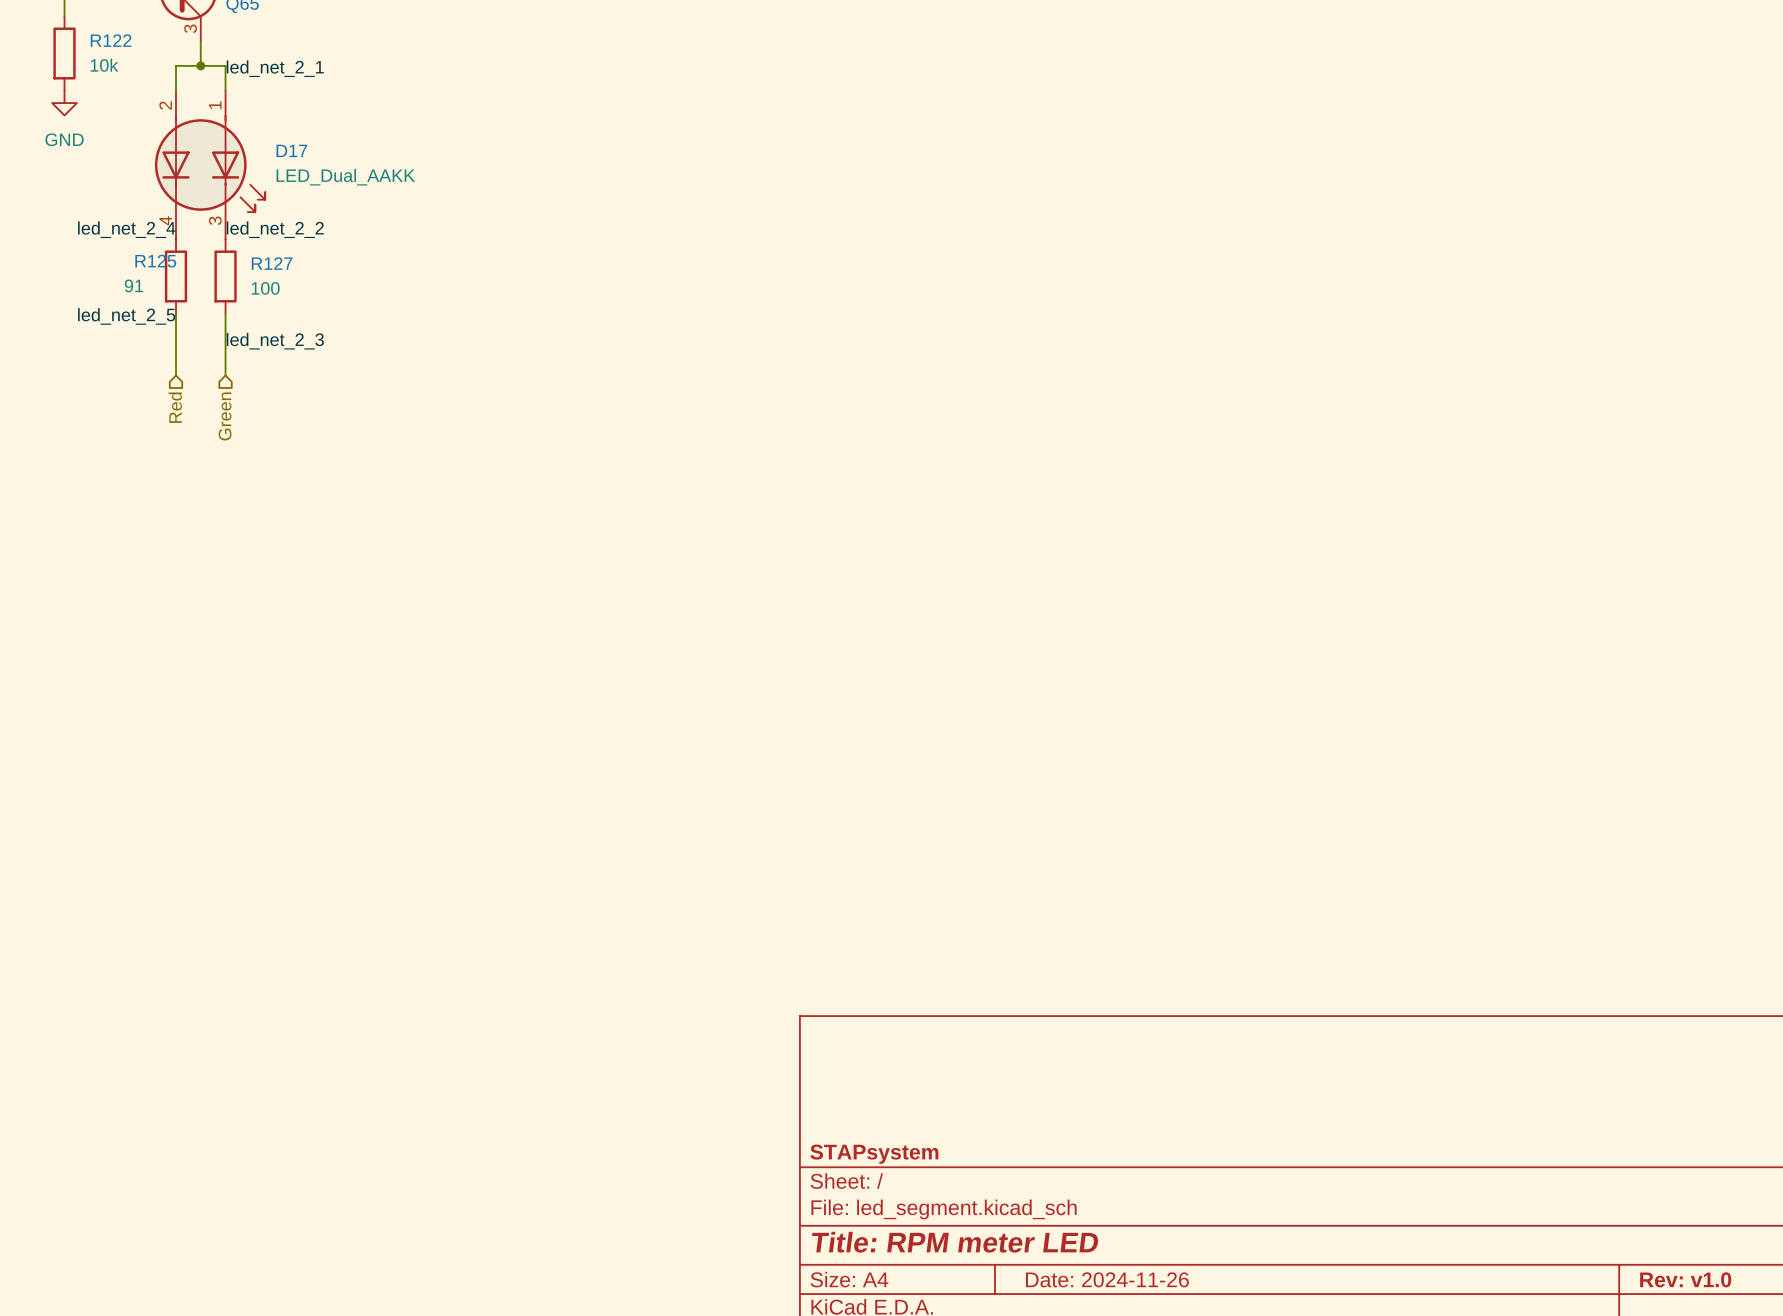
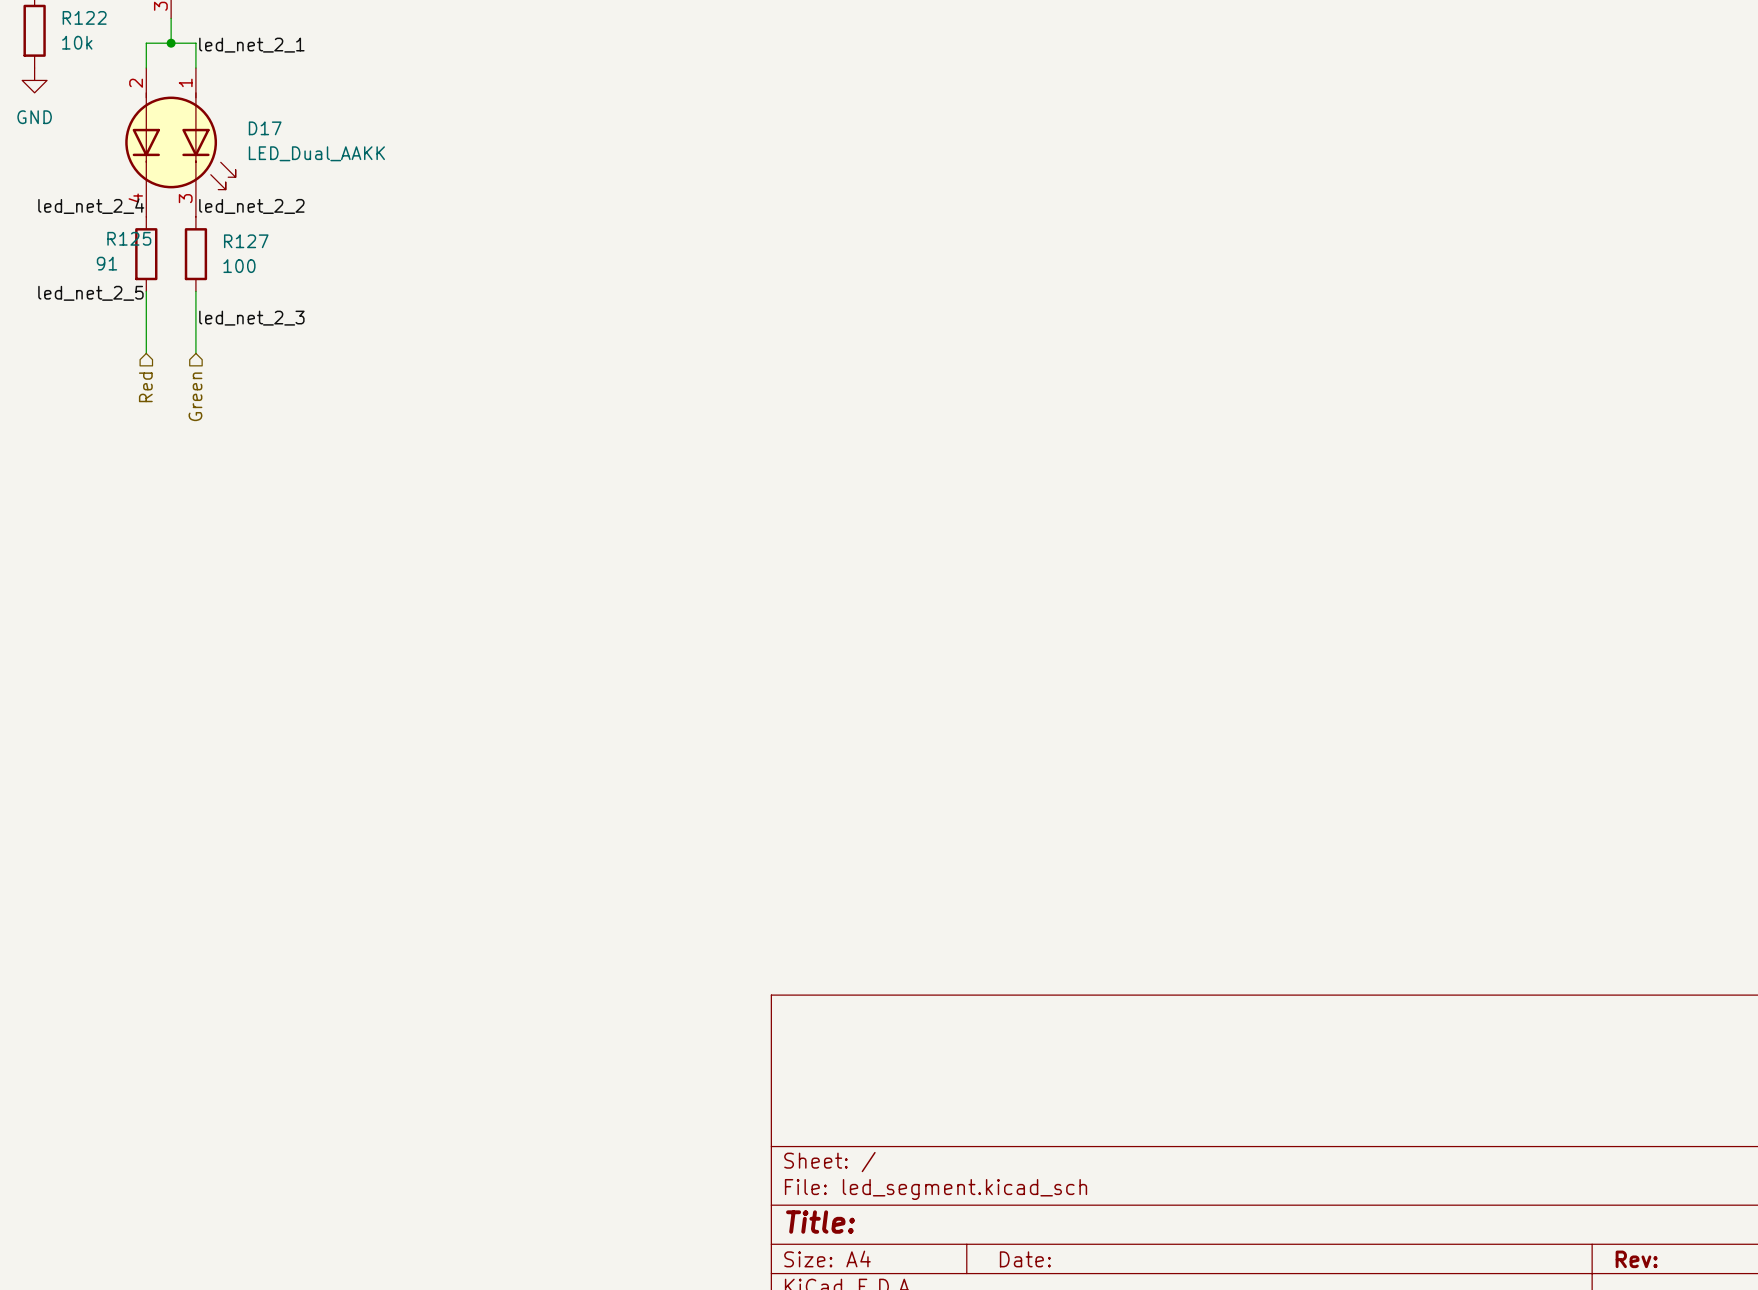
title block: STAPsystem (874, 1154) -> none
title block: Title: RPM meter LED (955, 1242) -> Title: (820, 1222)
title block: Date: 2024-11-26 (1107, 1279) -> Date: (1025, 1259)
title block: Rev: v1.0 (1685, 1279) -> Rev: (1636, 1259)

